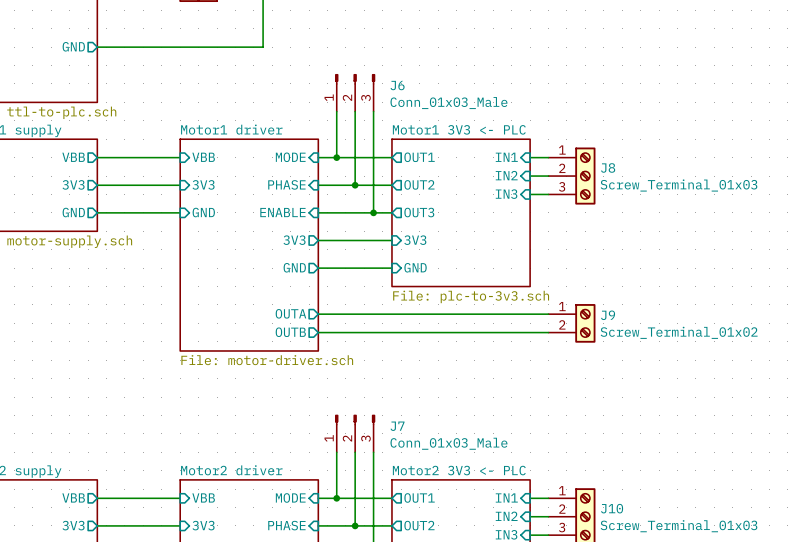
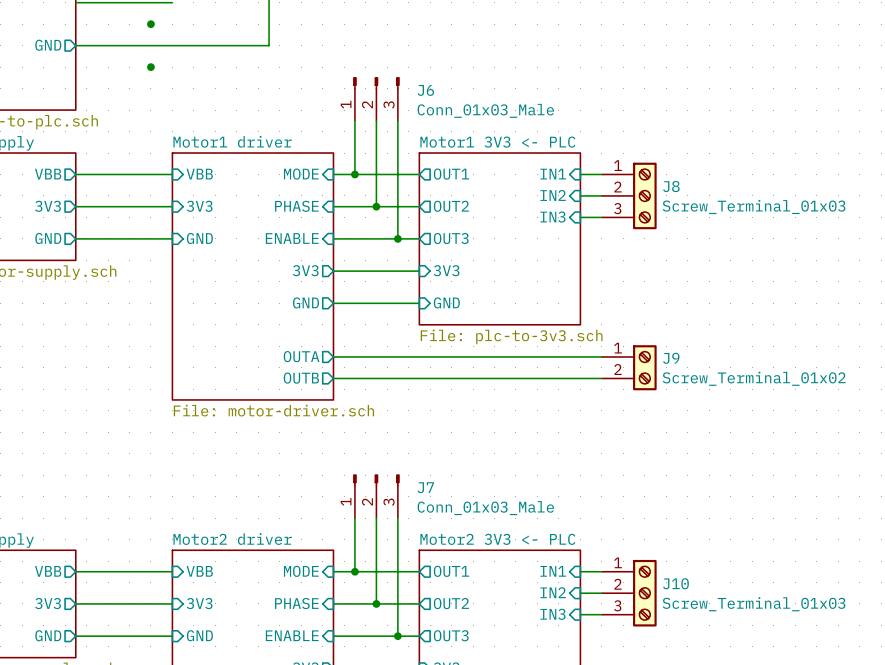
wire: none -> (75, 2) (172, 2)
junction: none -> (150, 24)
junction: none -> (150, 67)

